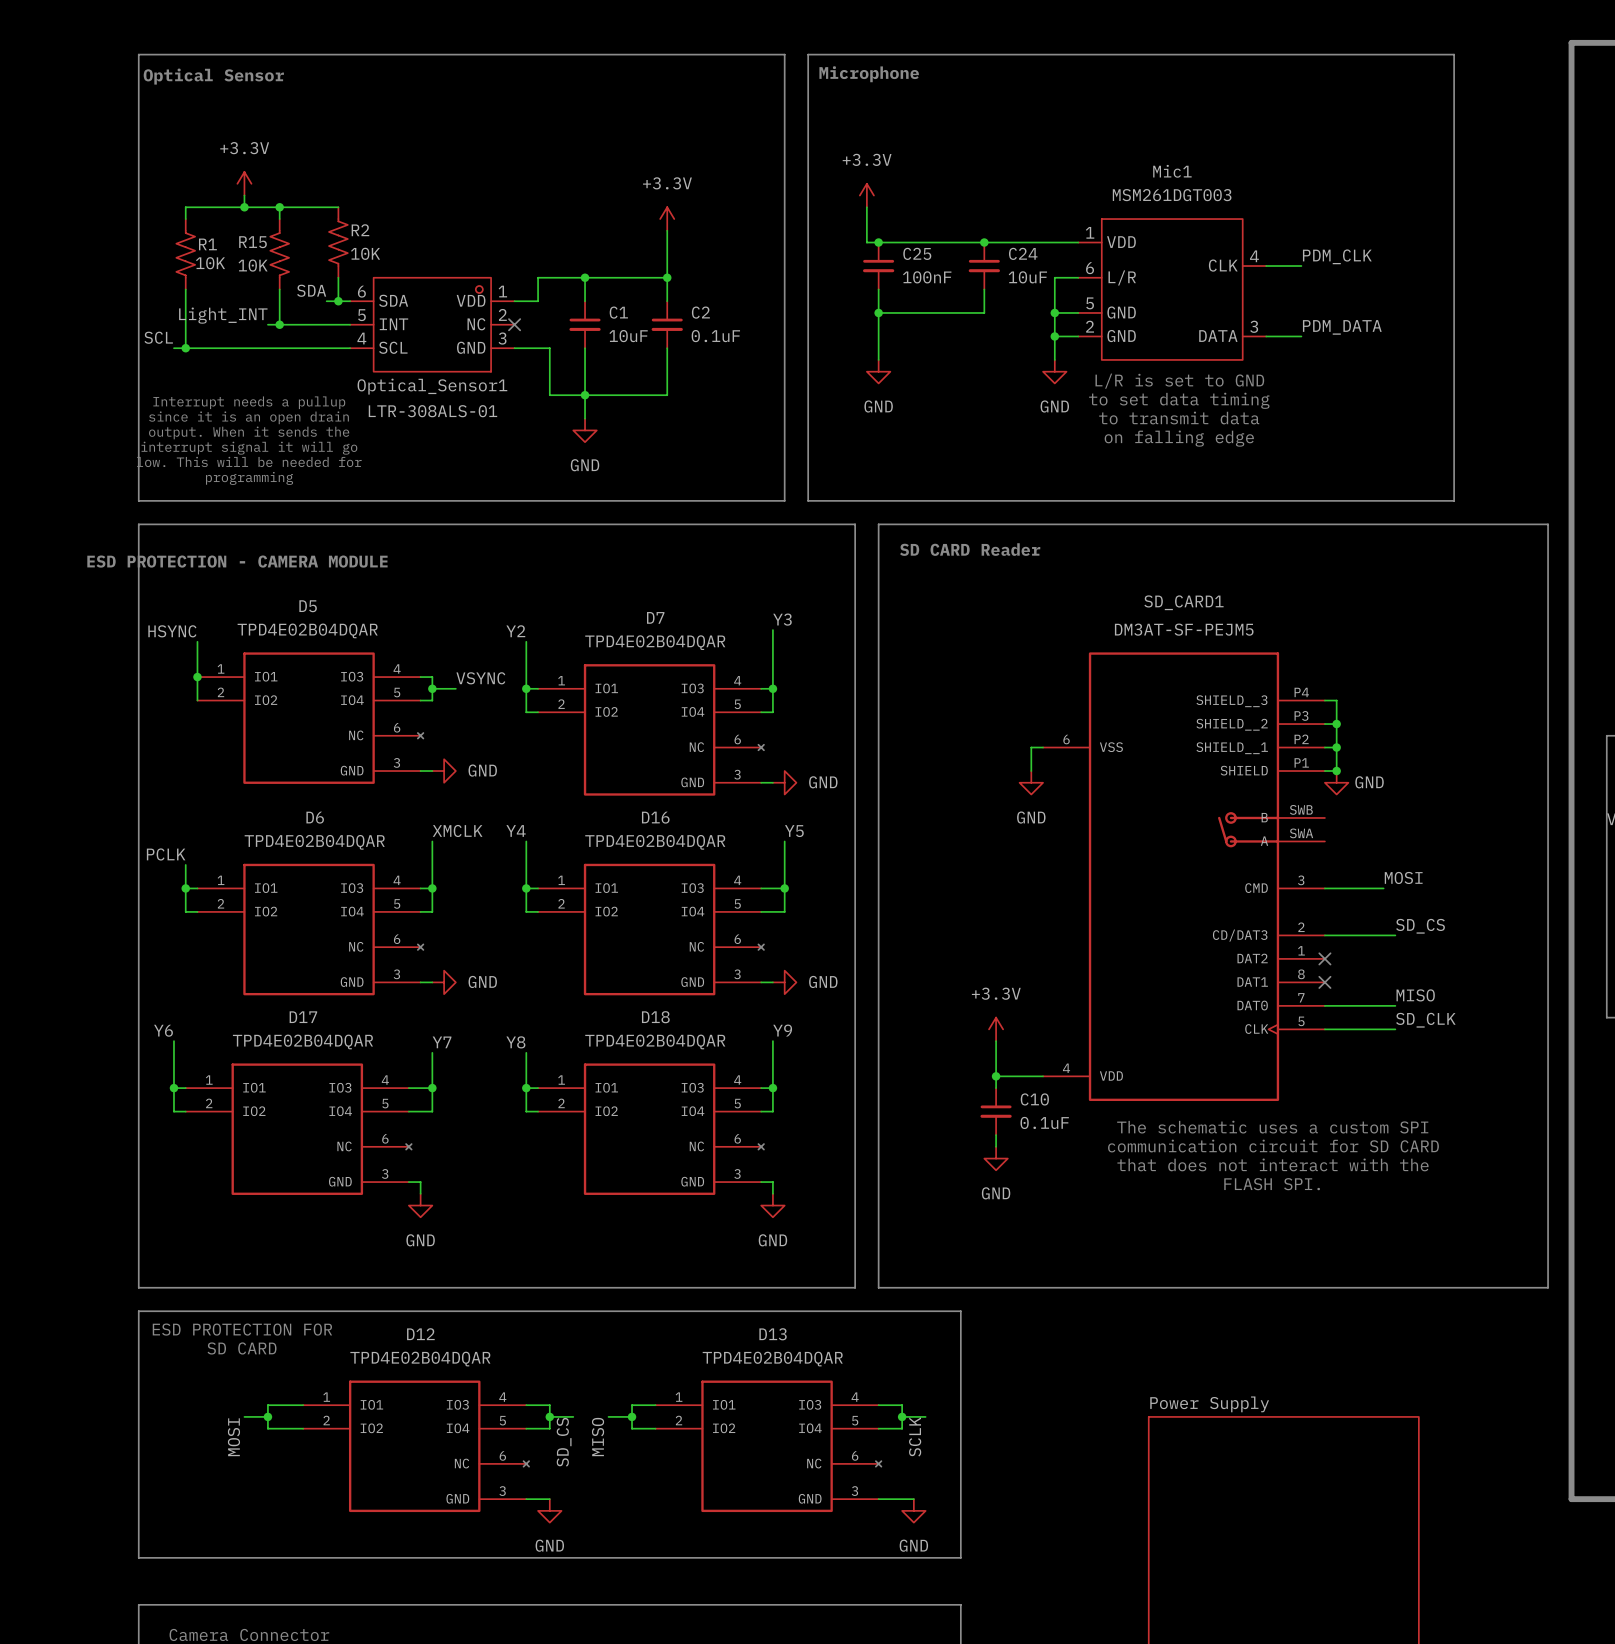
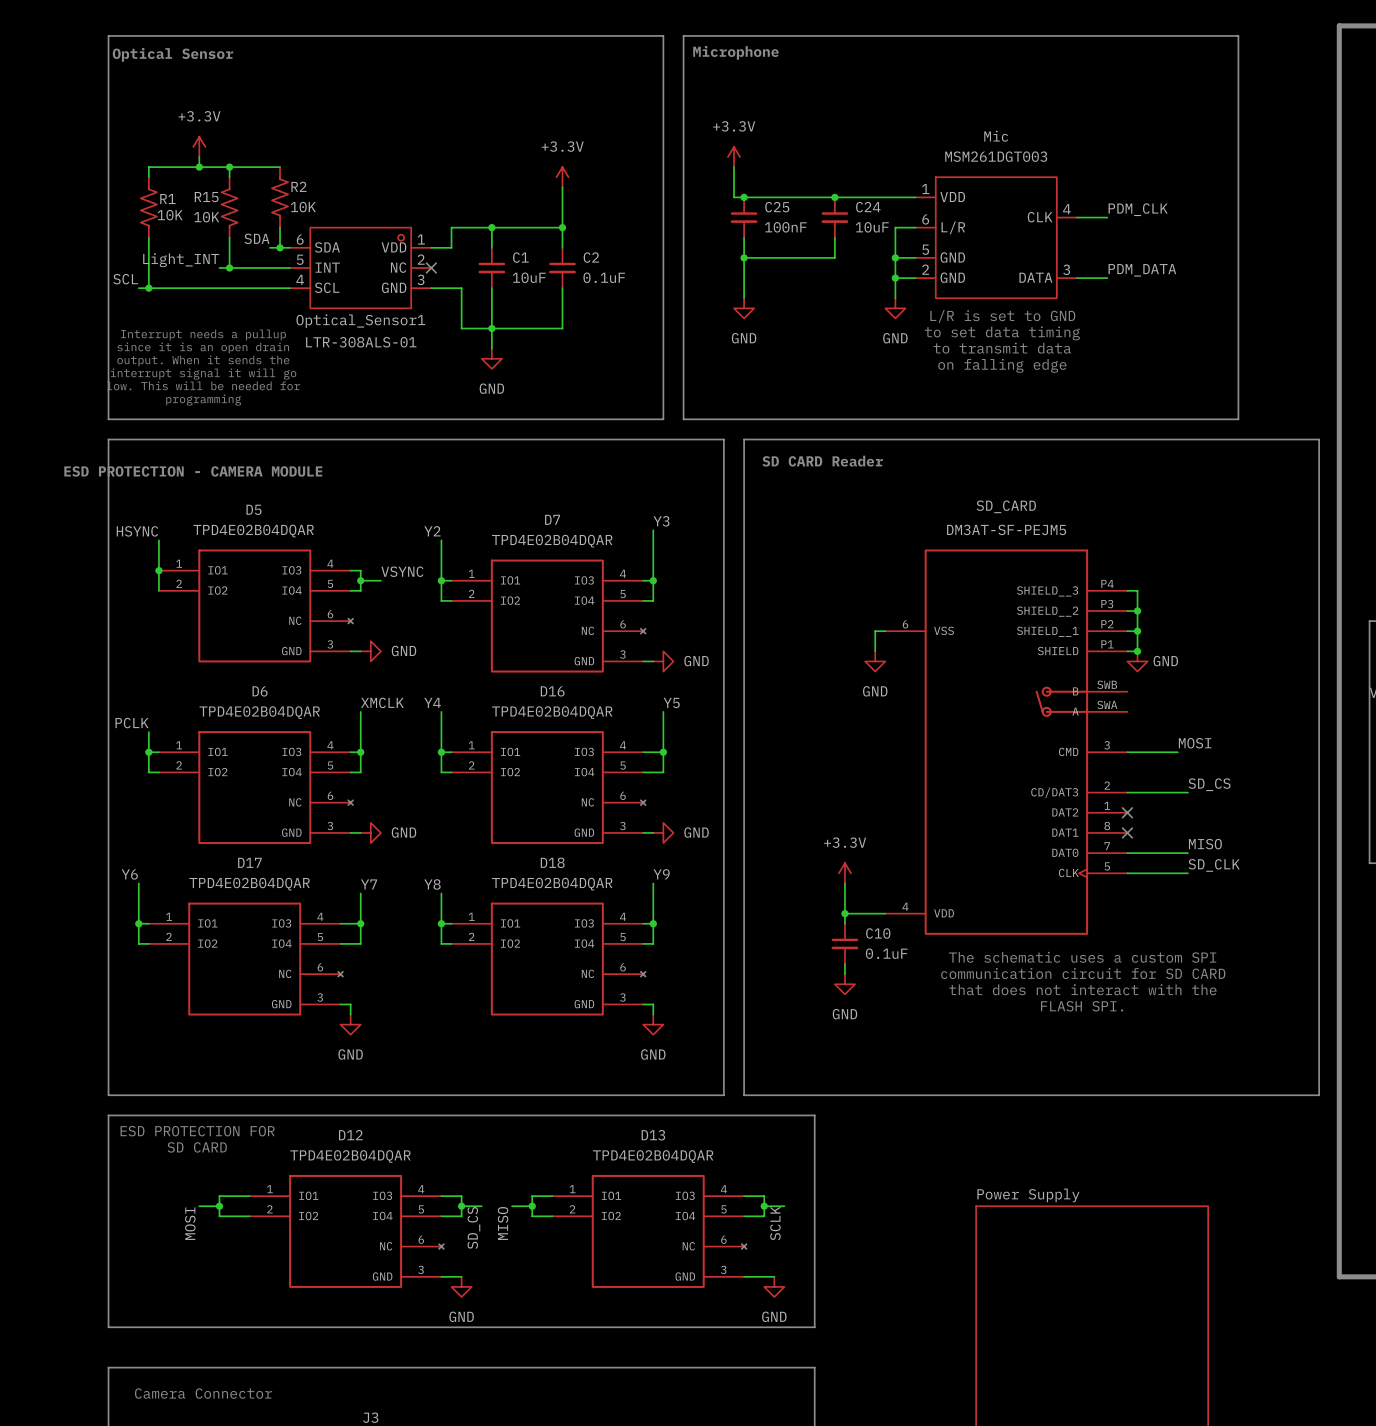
Mic1 name: Mic1 (1172, 171) -> Mic (996, 136)
SD_CARD1 name: SD_CARD1 (1183, 602) -> SD_CARD (1006, 506)

